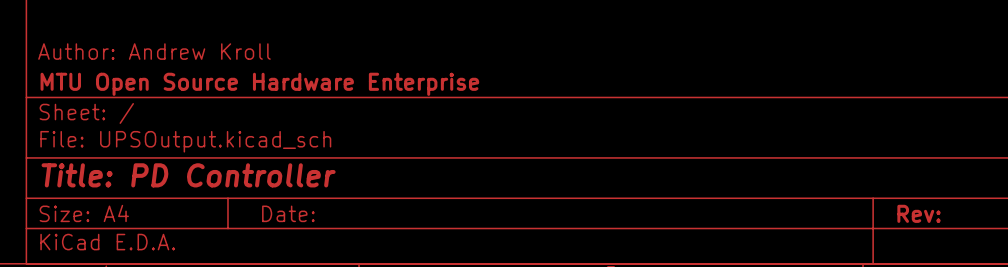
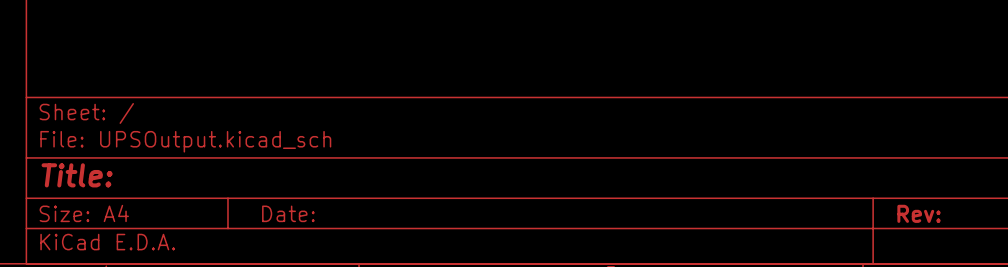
title block: Author: Andrew Kroll (154, 51) -> none
title block: MTU Open Source Hardware Enterprise (259, 84) -> none
title block: Title: PD Controller (188, 175) -> Title: (77, 175)

